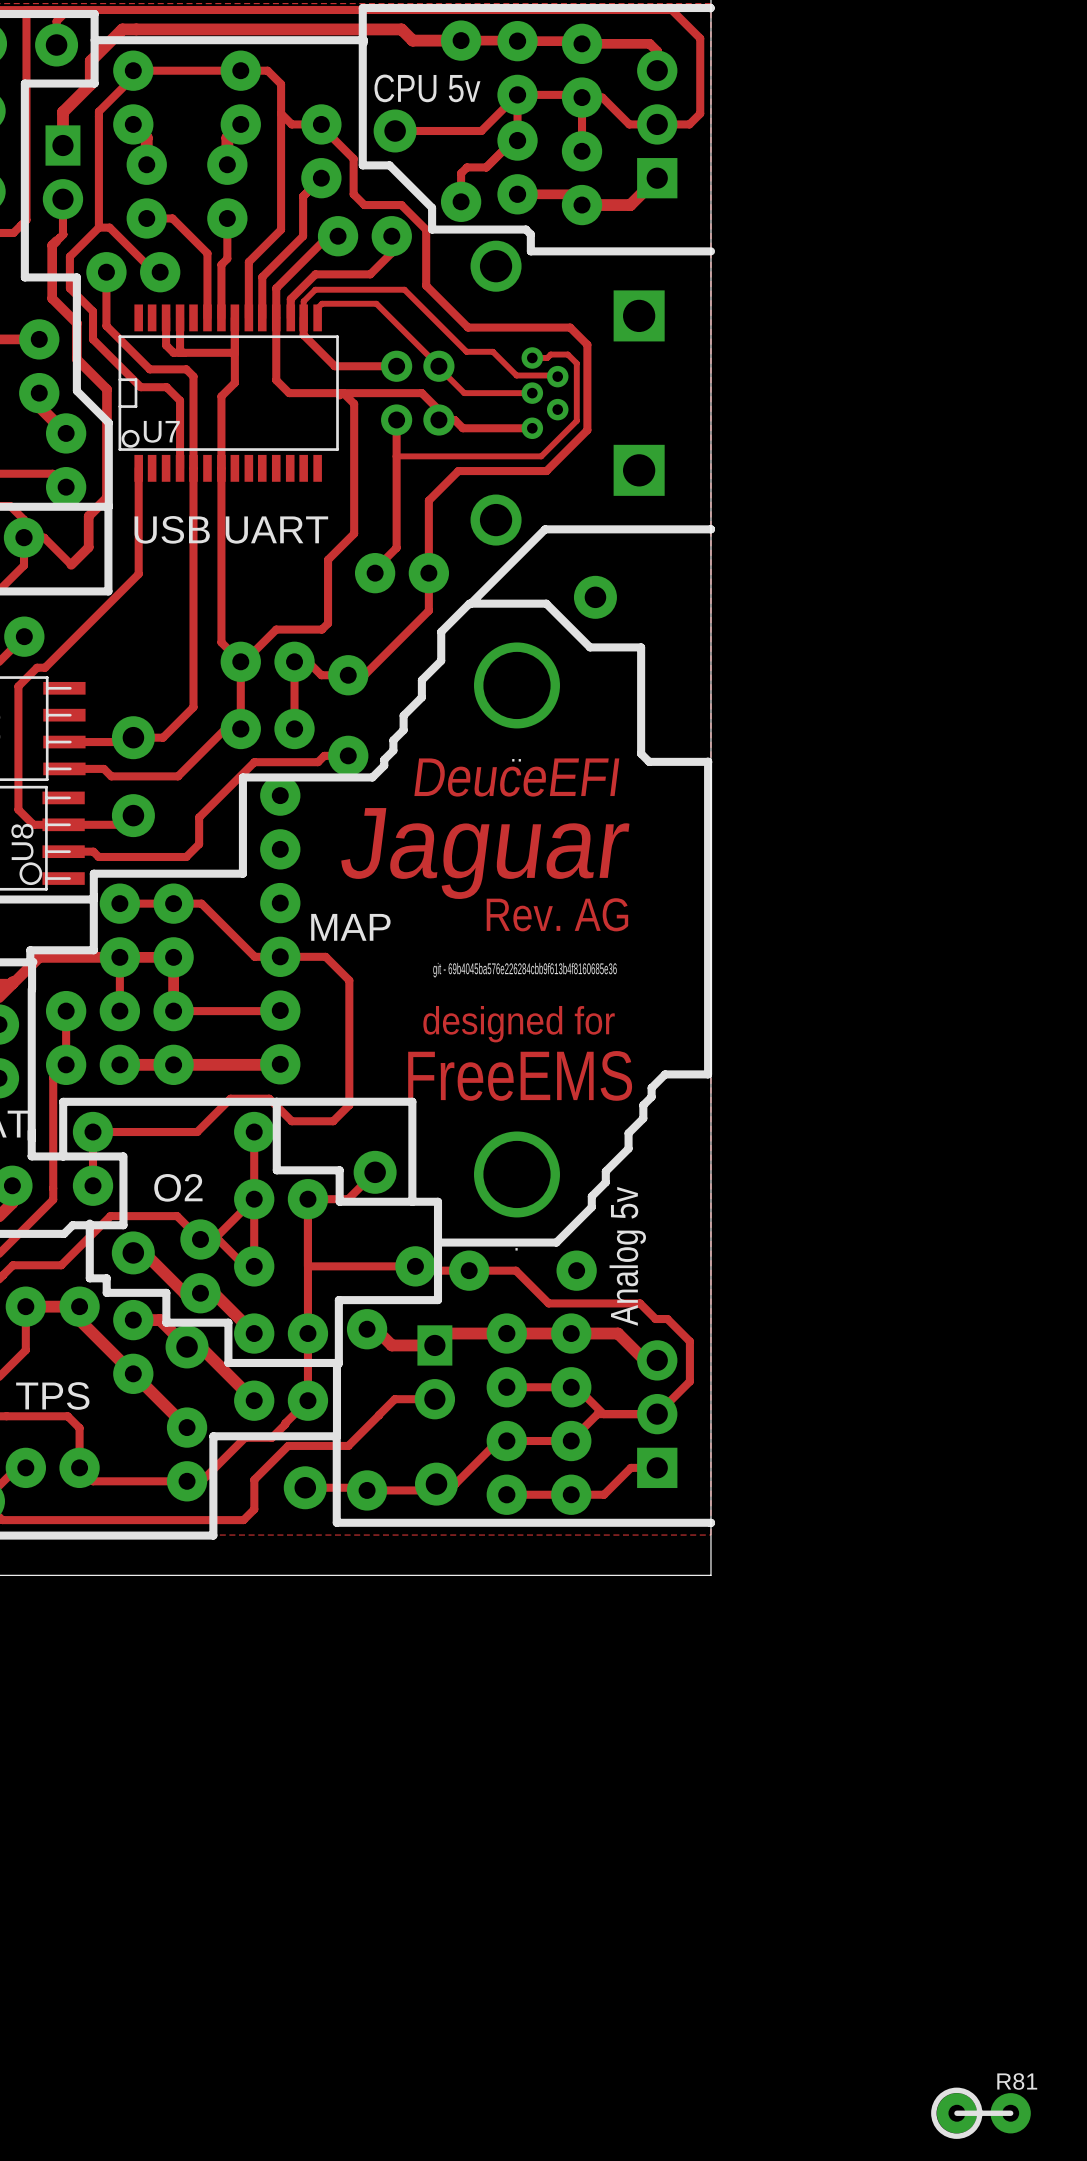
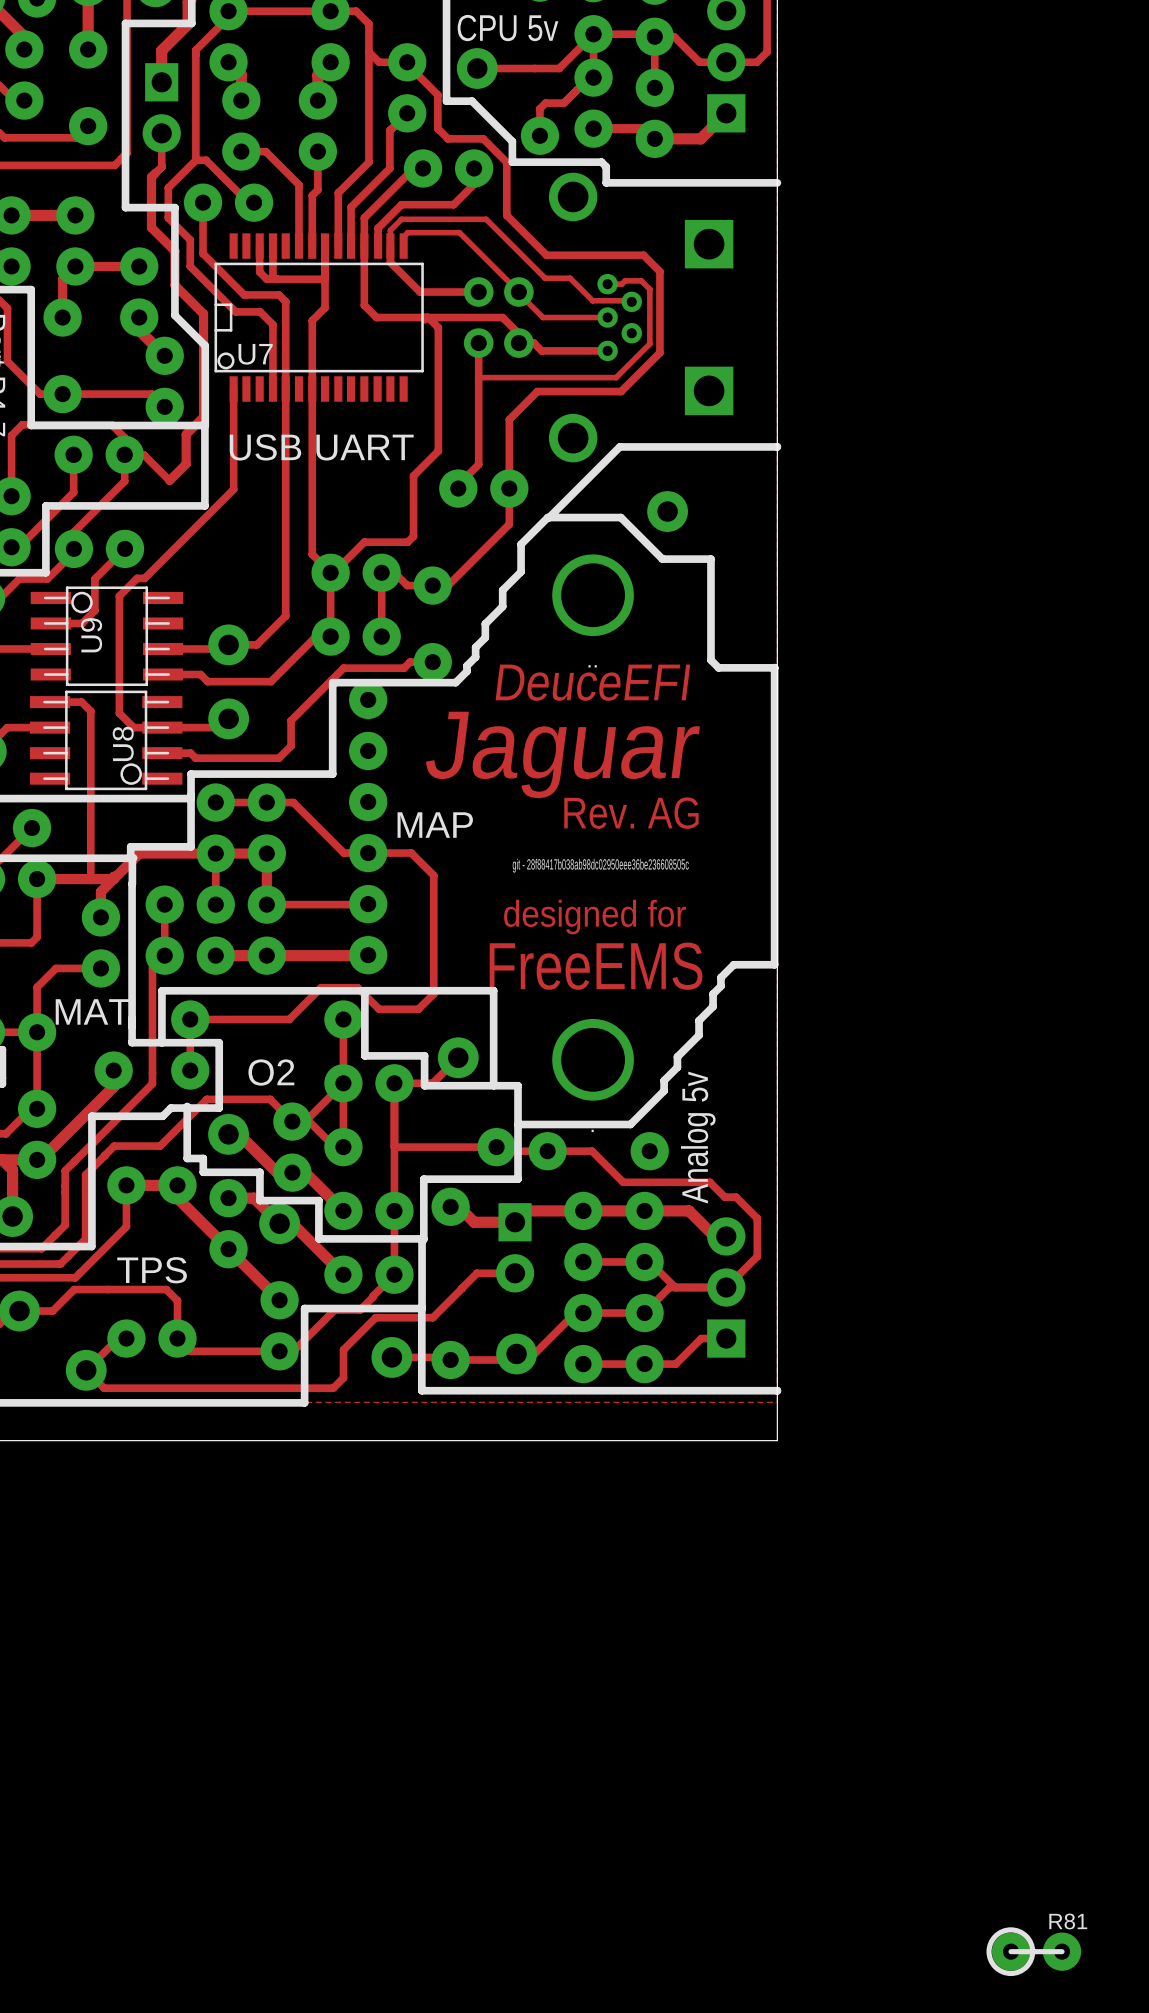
text: git - 69b4045ba576e226284cbb9f613b4f8160685e36 (525, 970) -> git - 28f88417b038ab98dc02950eee36be236608505c (600, 865)

